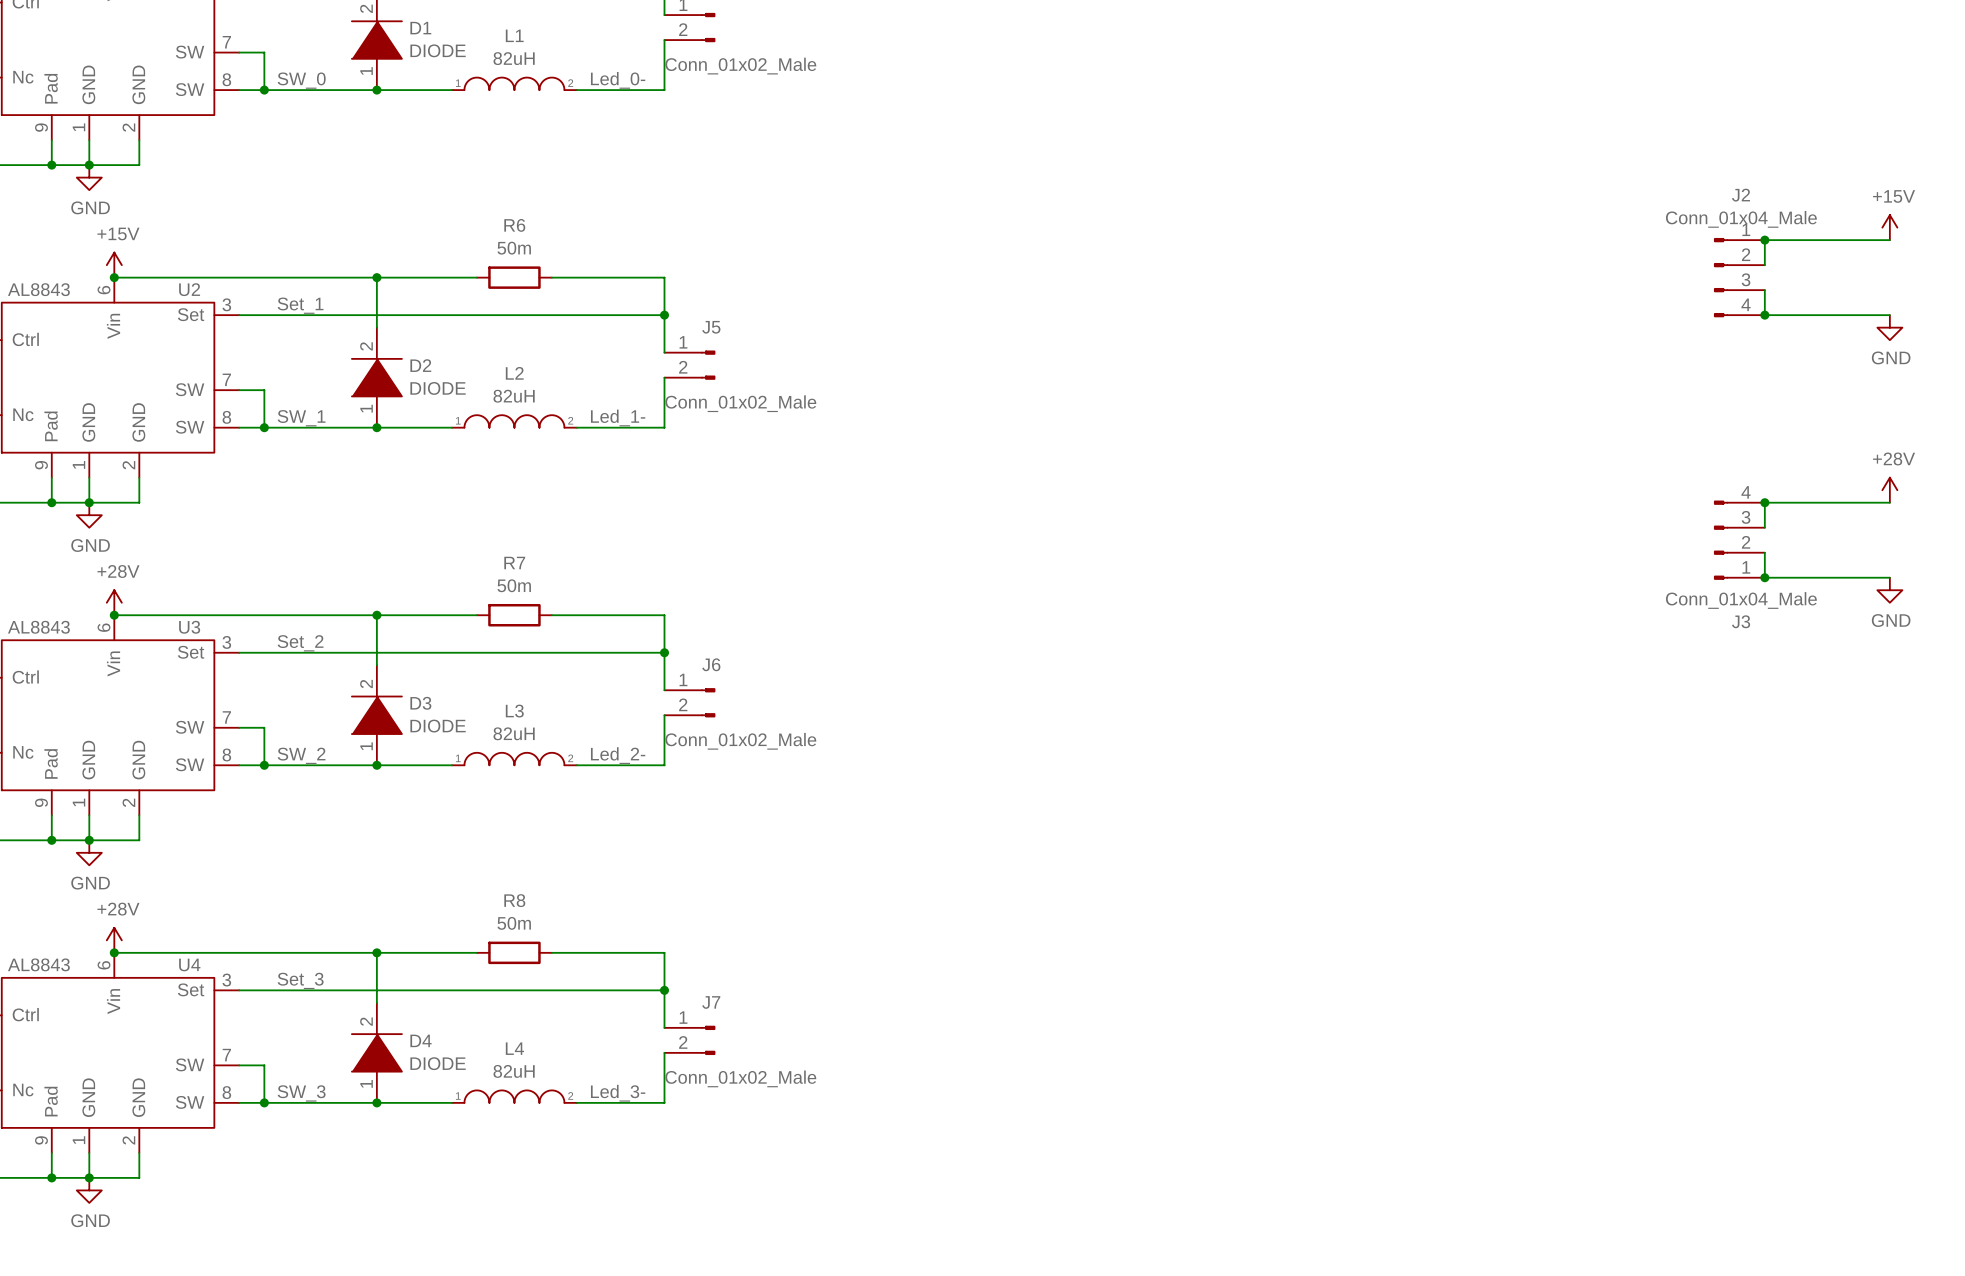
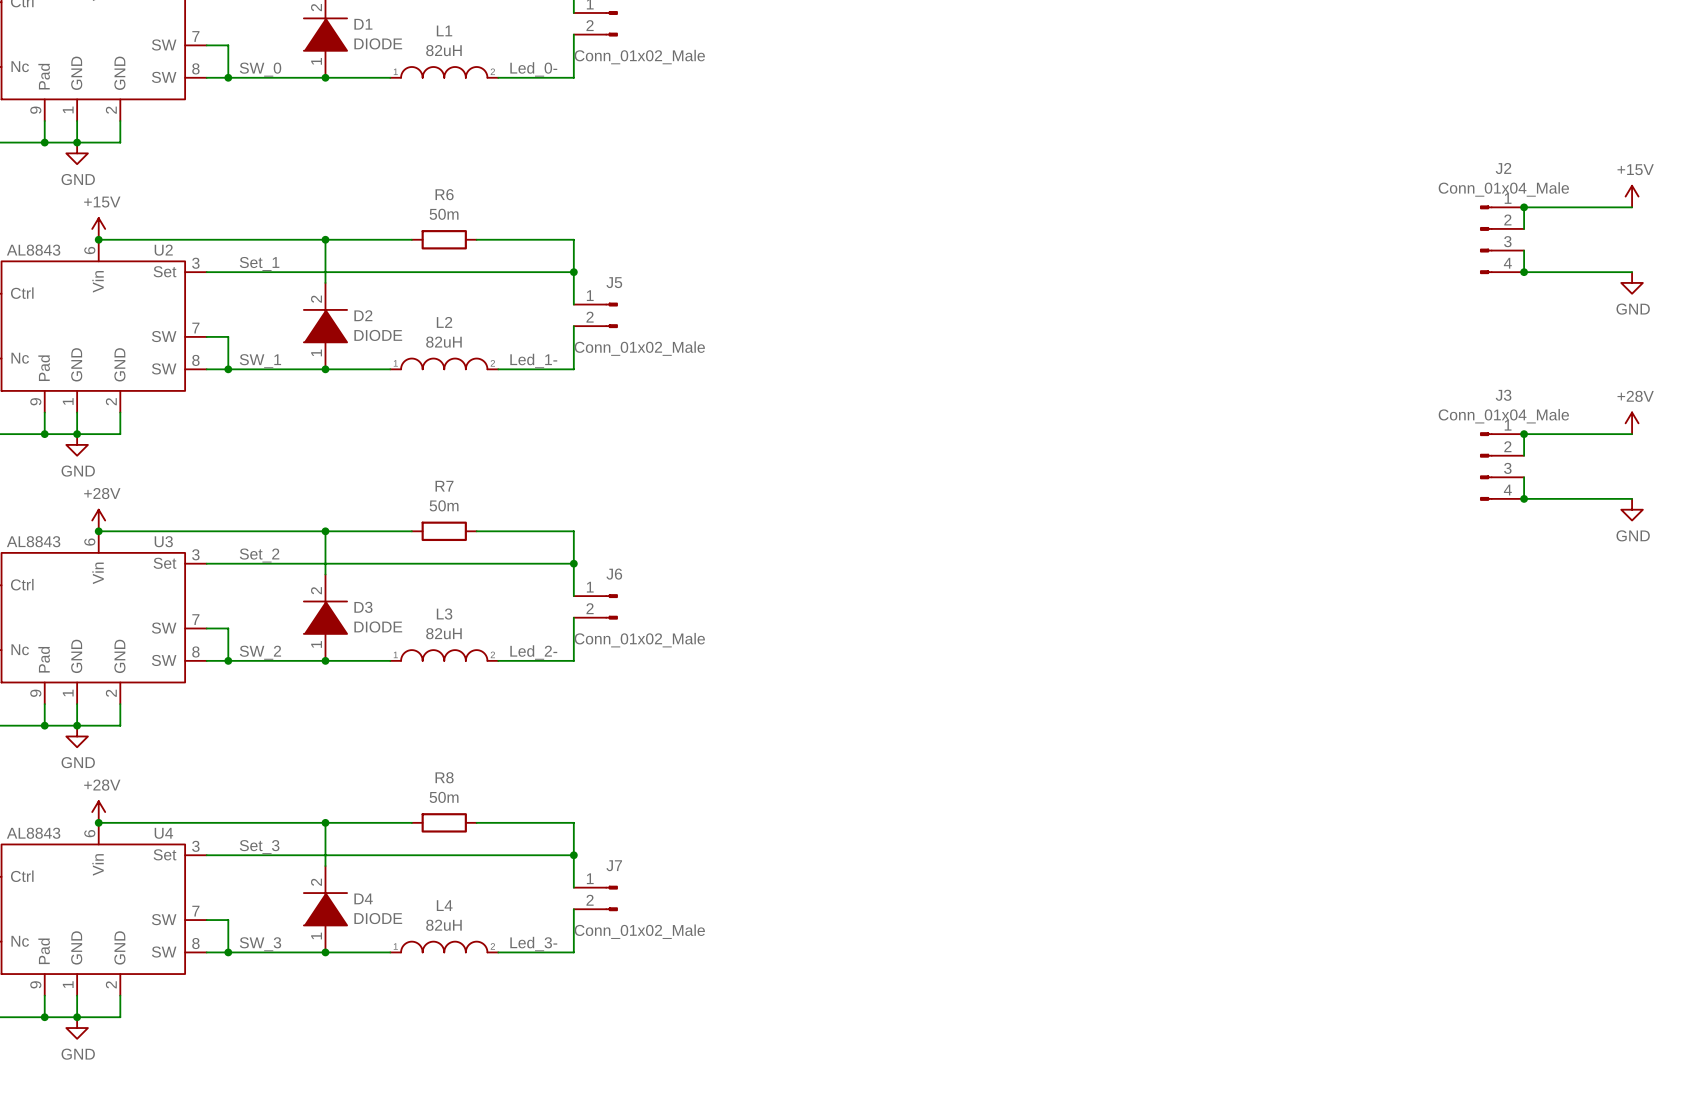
J3 flip: as is (1721, 540) -> up-down (1486, 466)

